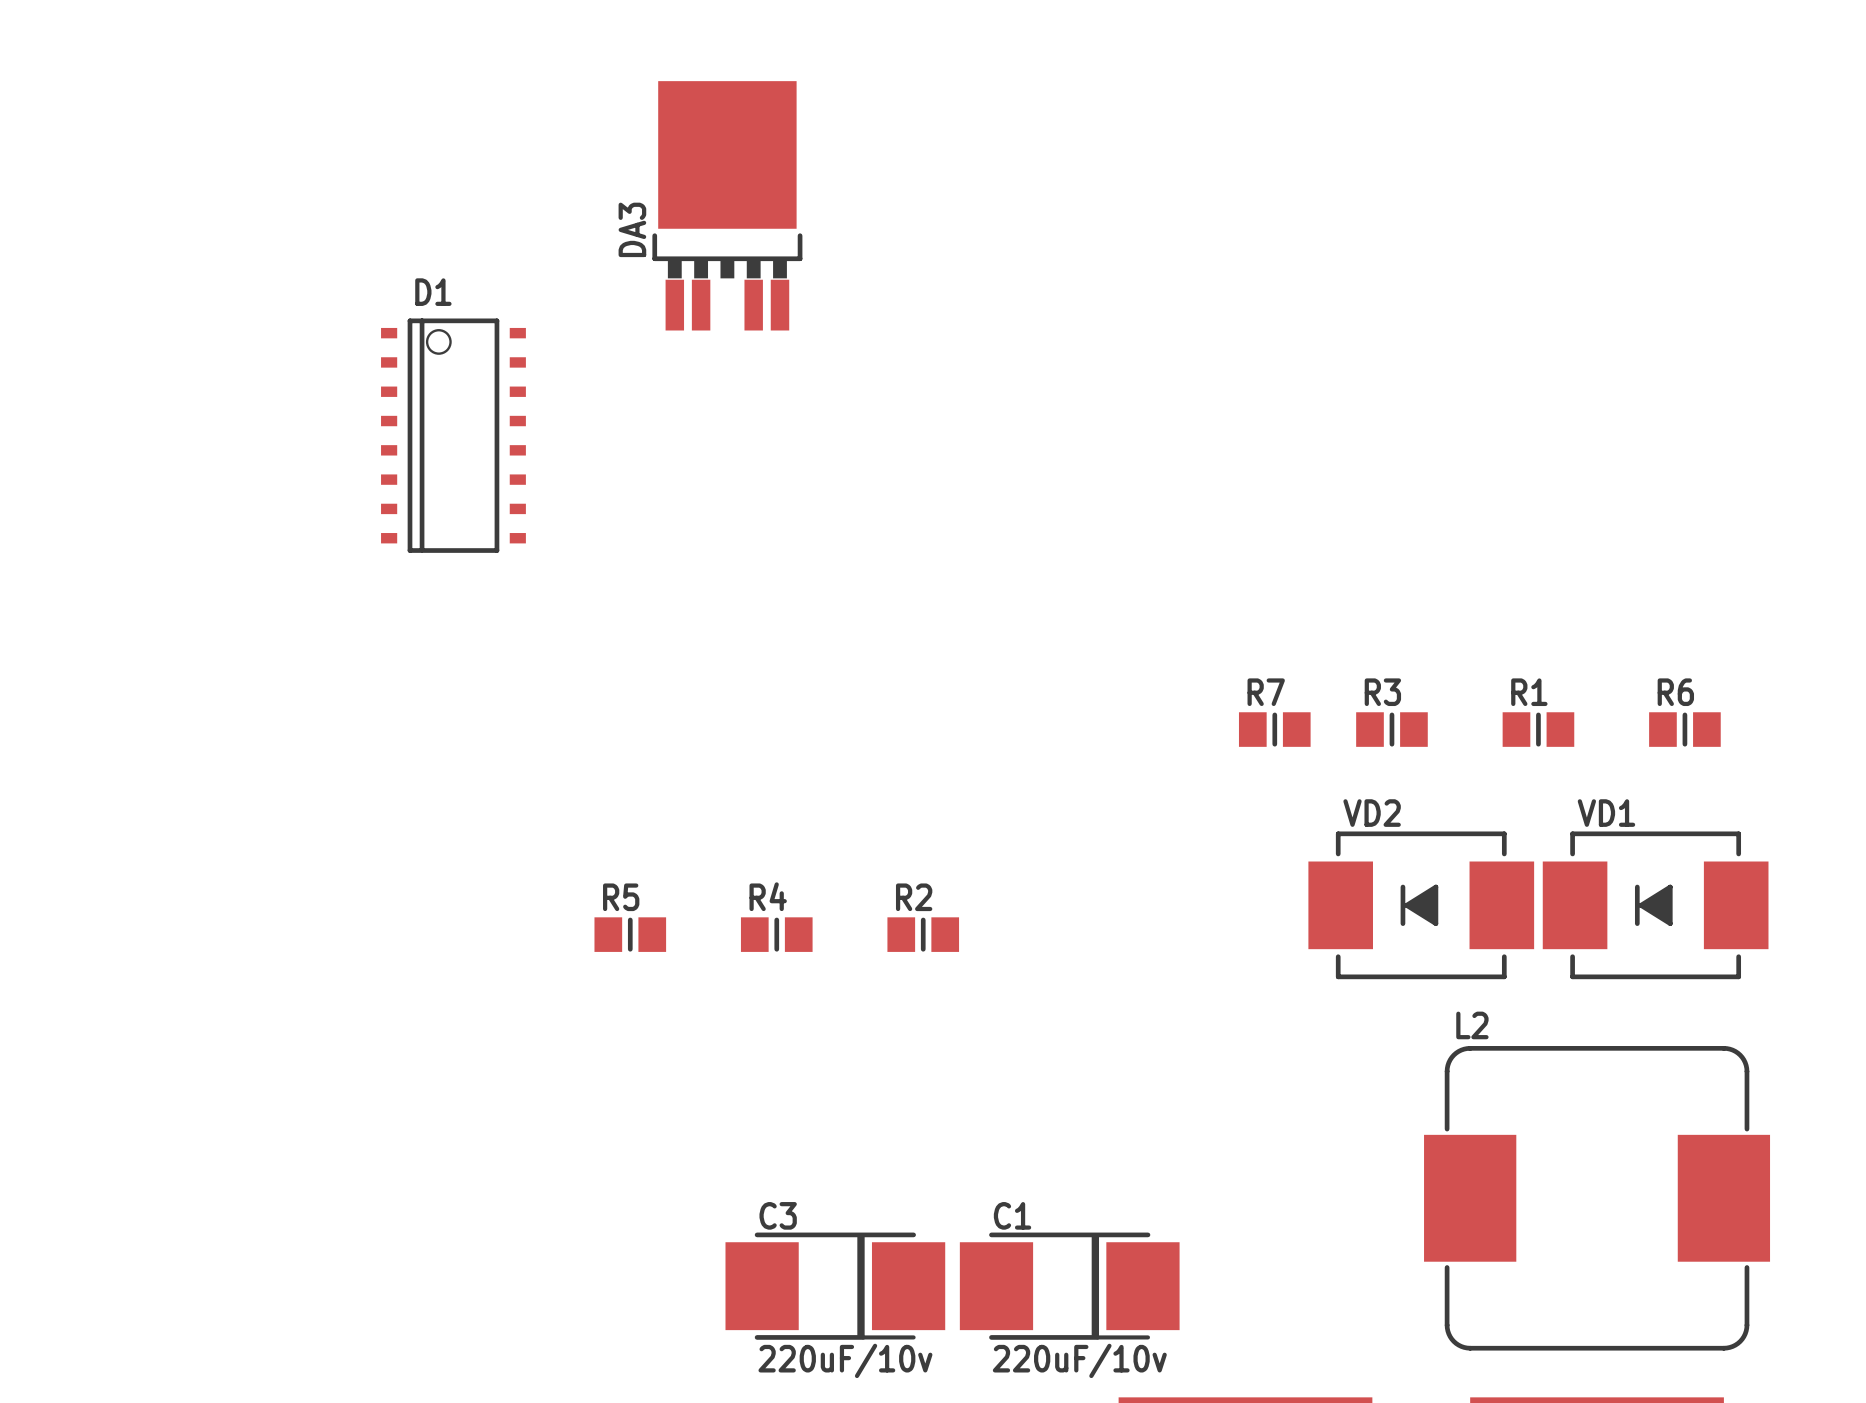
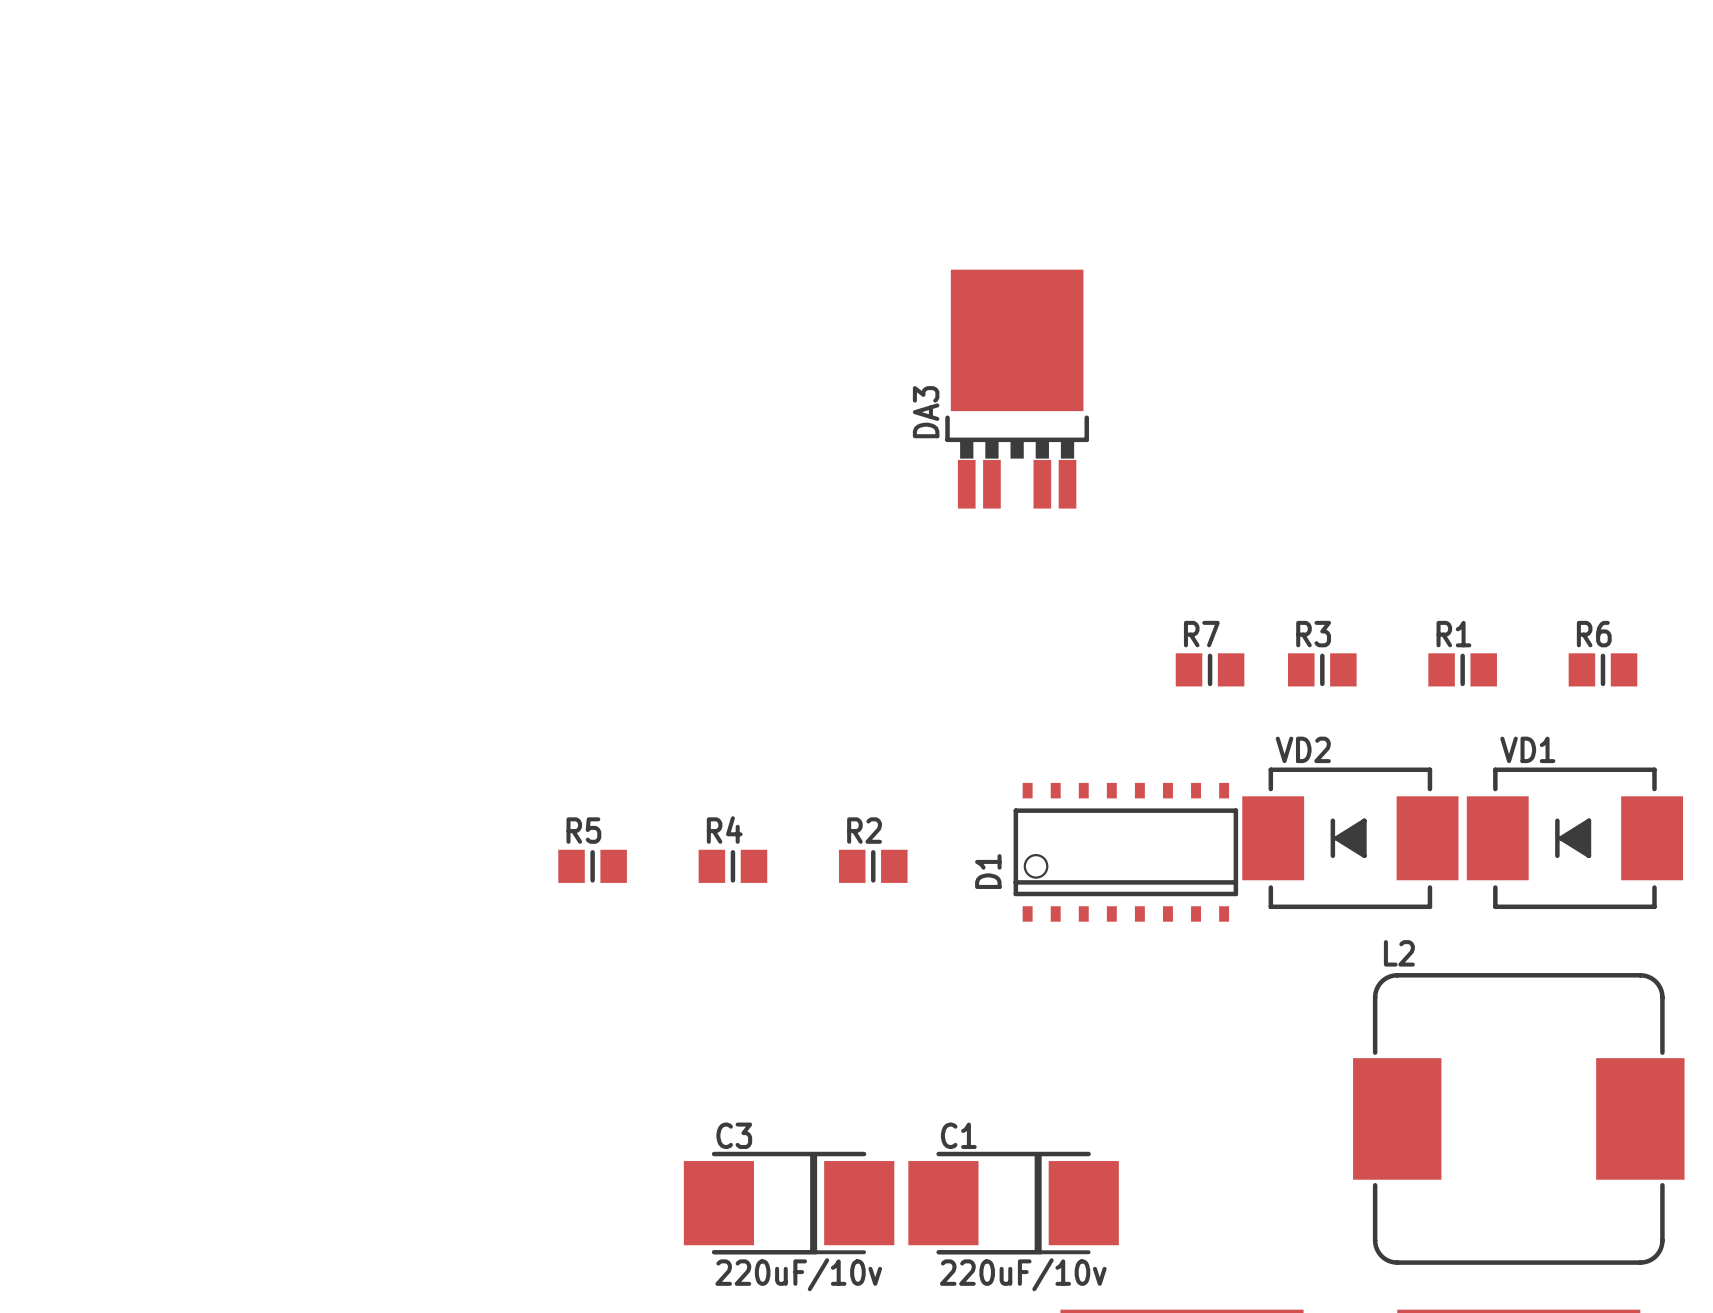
DA3 position: (727, 205) -> (1017, 389)
D1 rotation: 0° (453, 435) -> 90° counterclockwise (1125, 852)
D1 position: (453, 435) -> (1125, 852)

